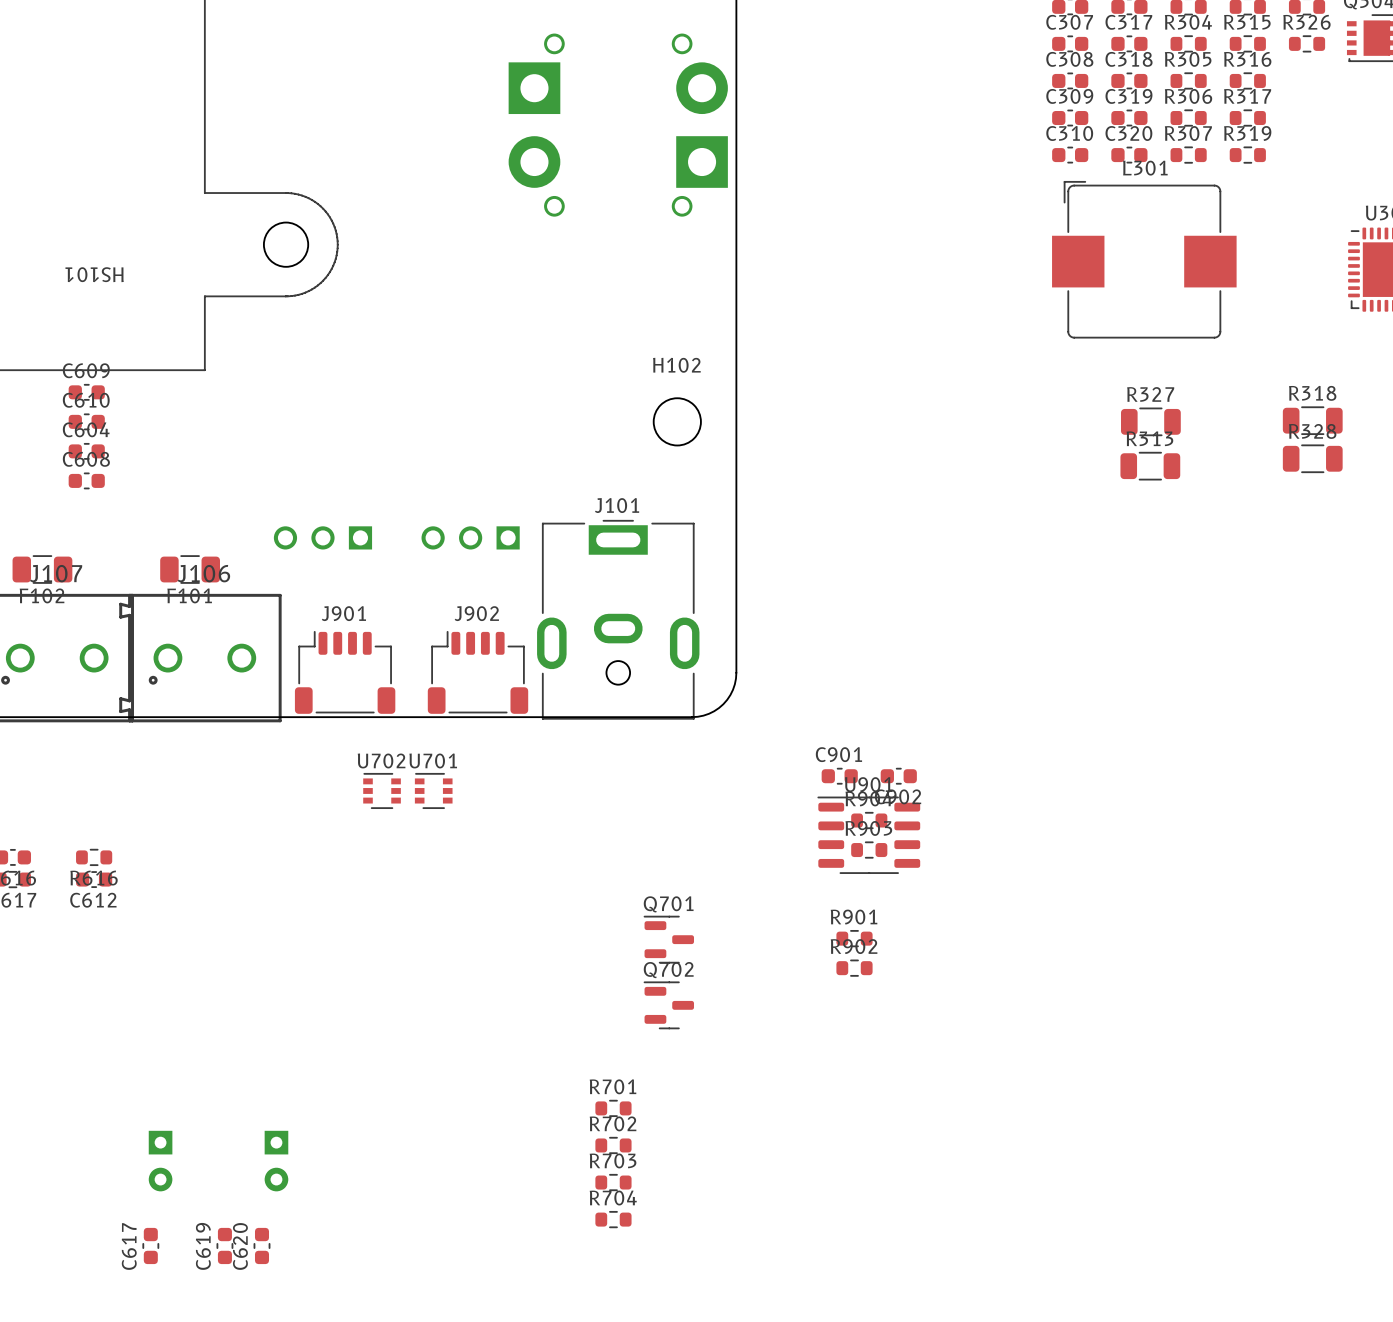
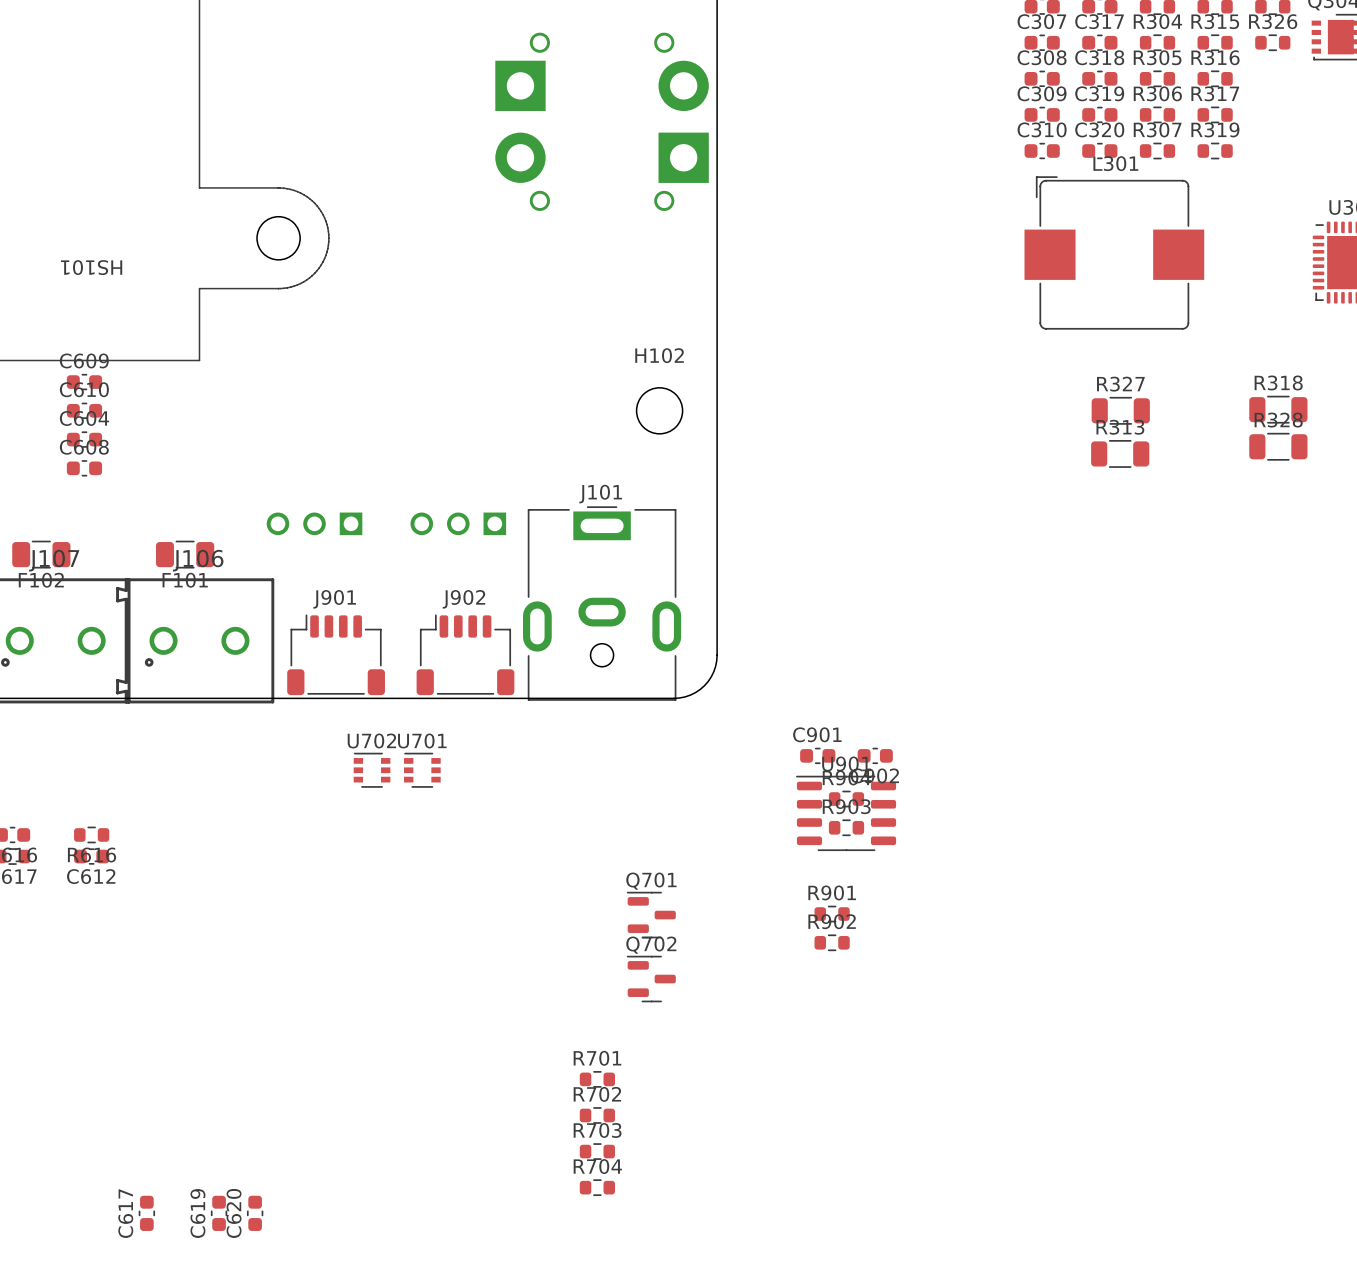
part: (160, 1161) -> none
part: (276, 1161) -> none

